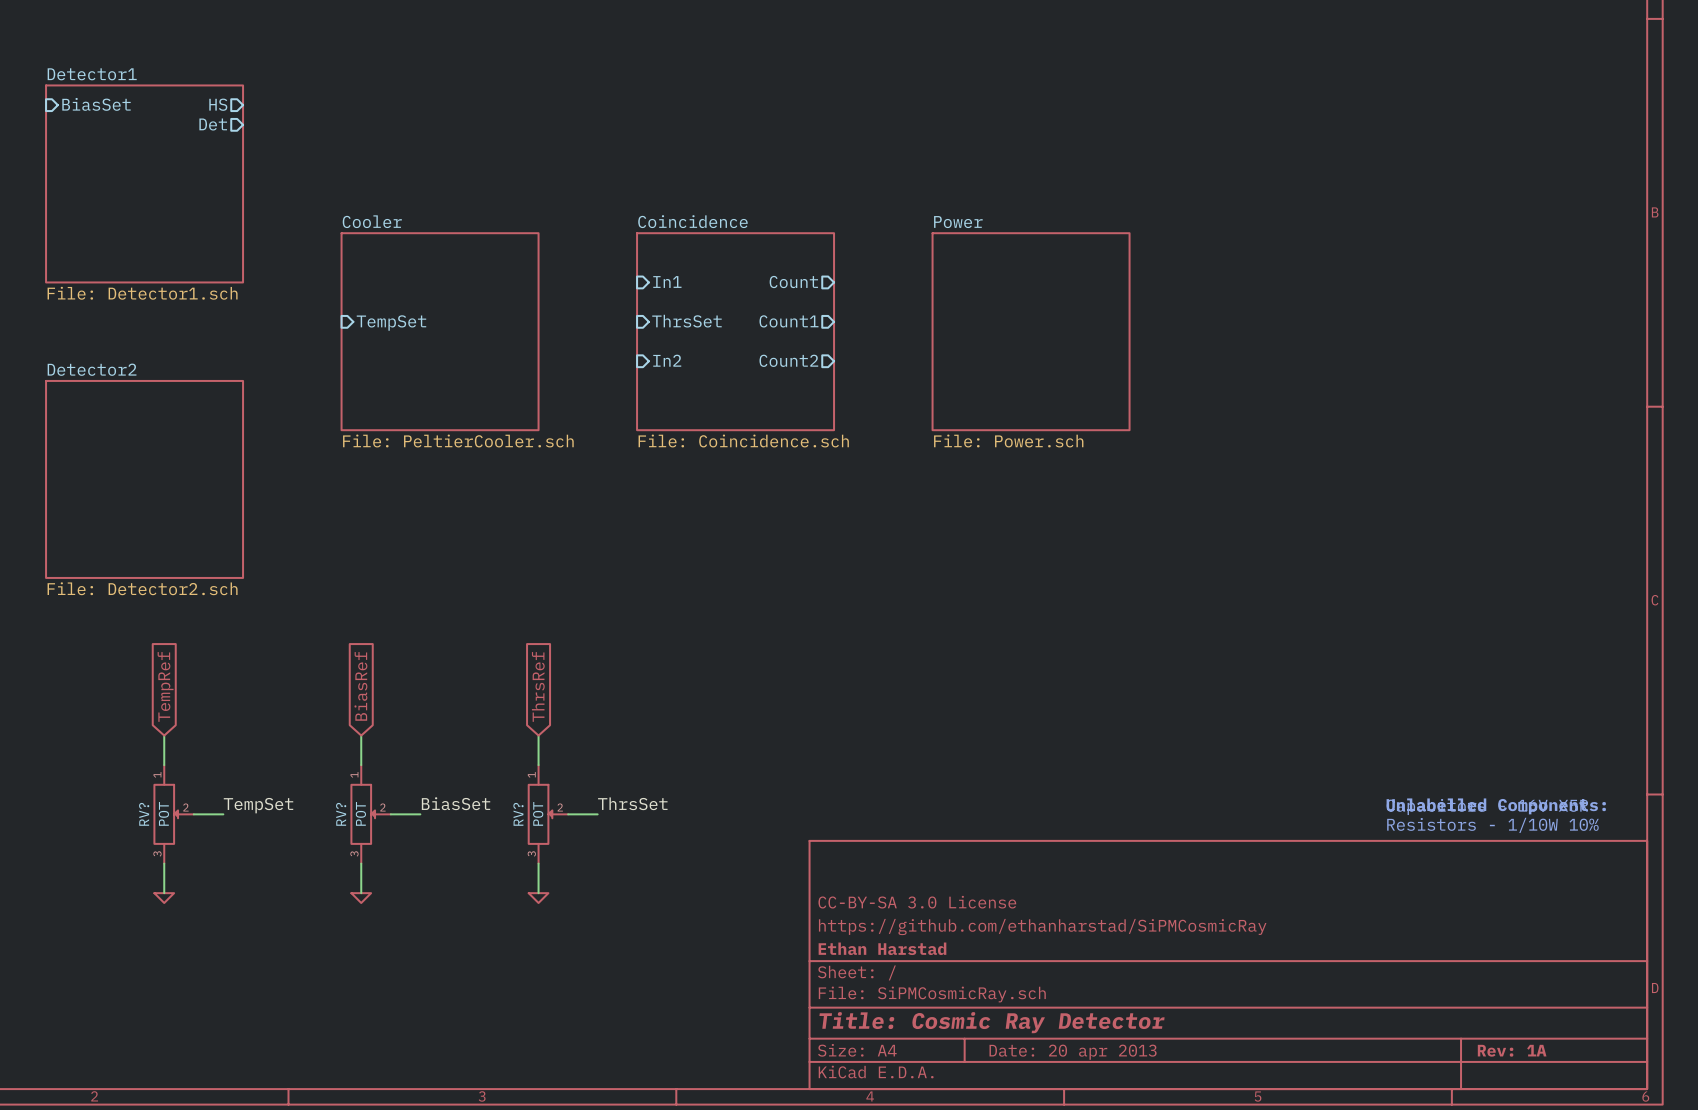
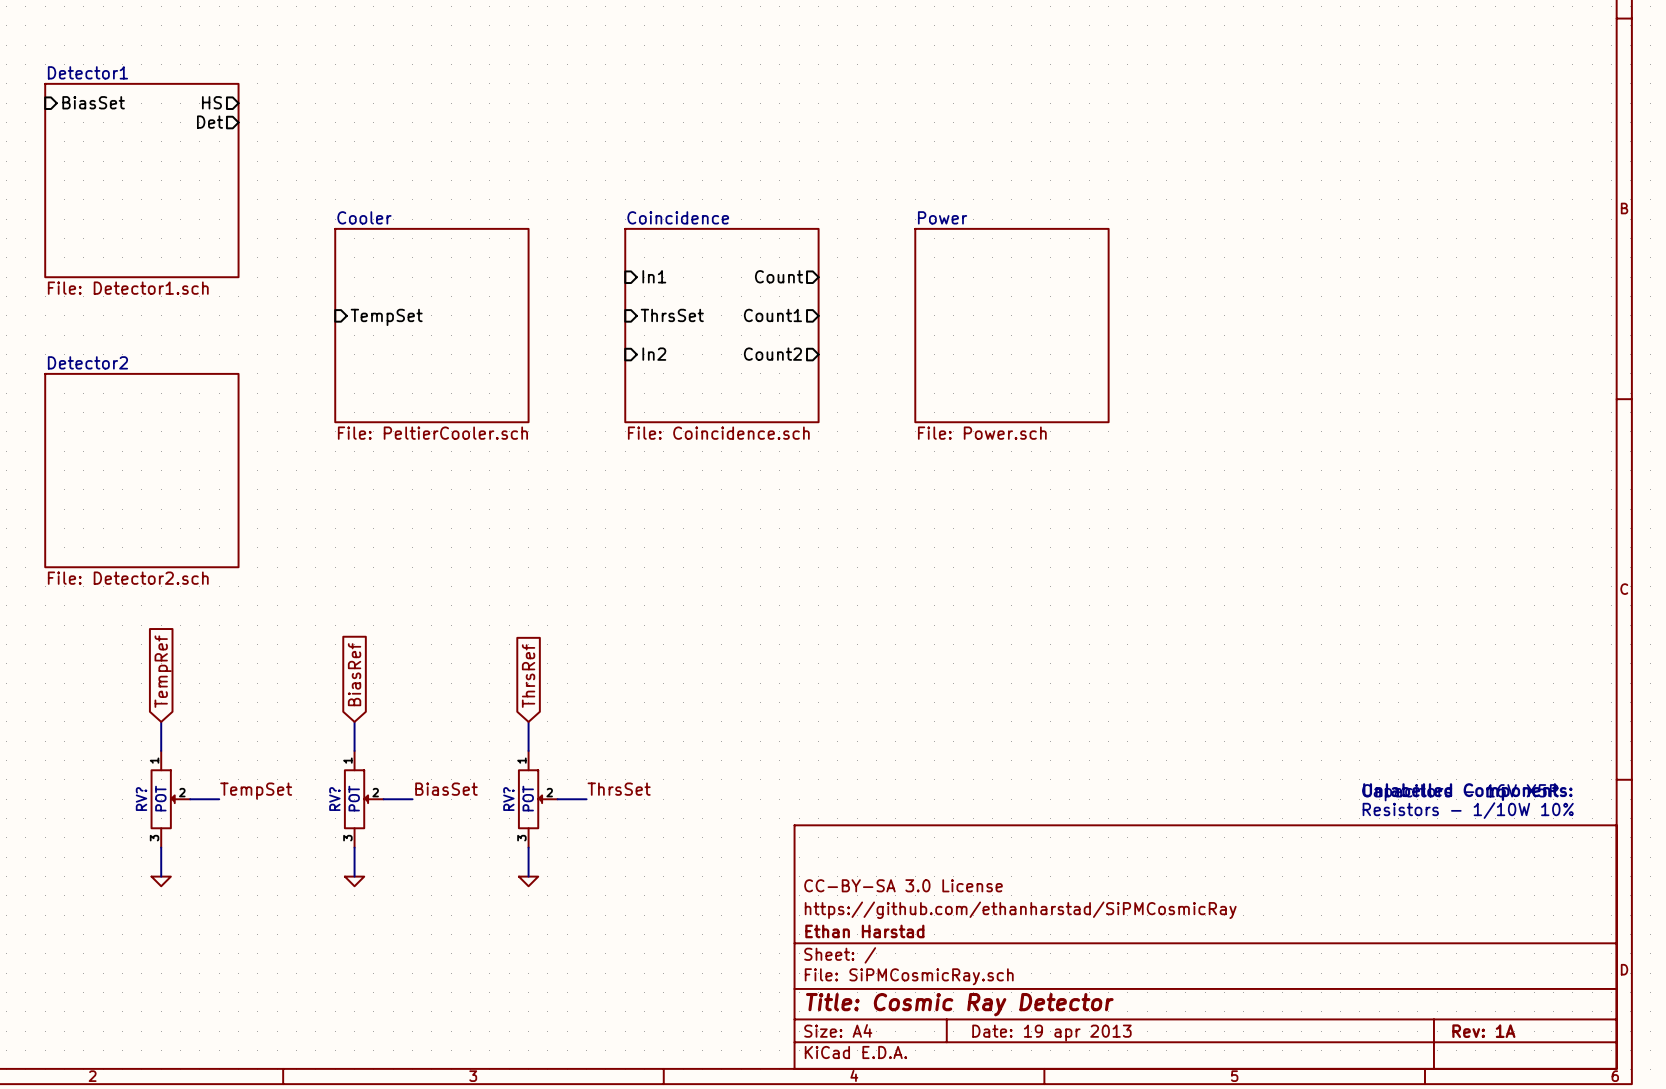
title block: Date: 20 apr 2013 (1073, 1052) -> Date: 19 apr 2013 (1051, 1033)

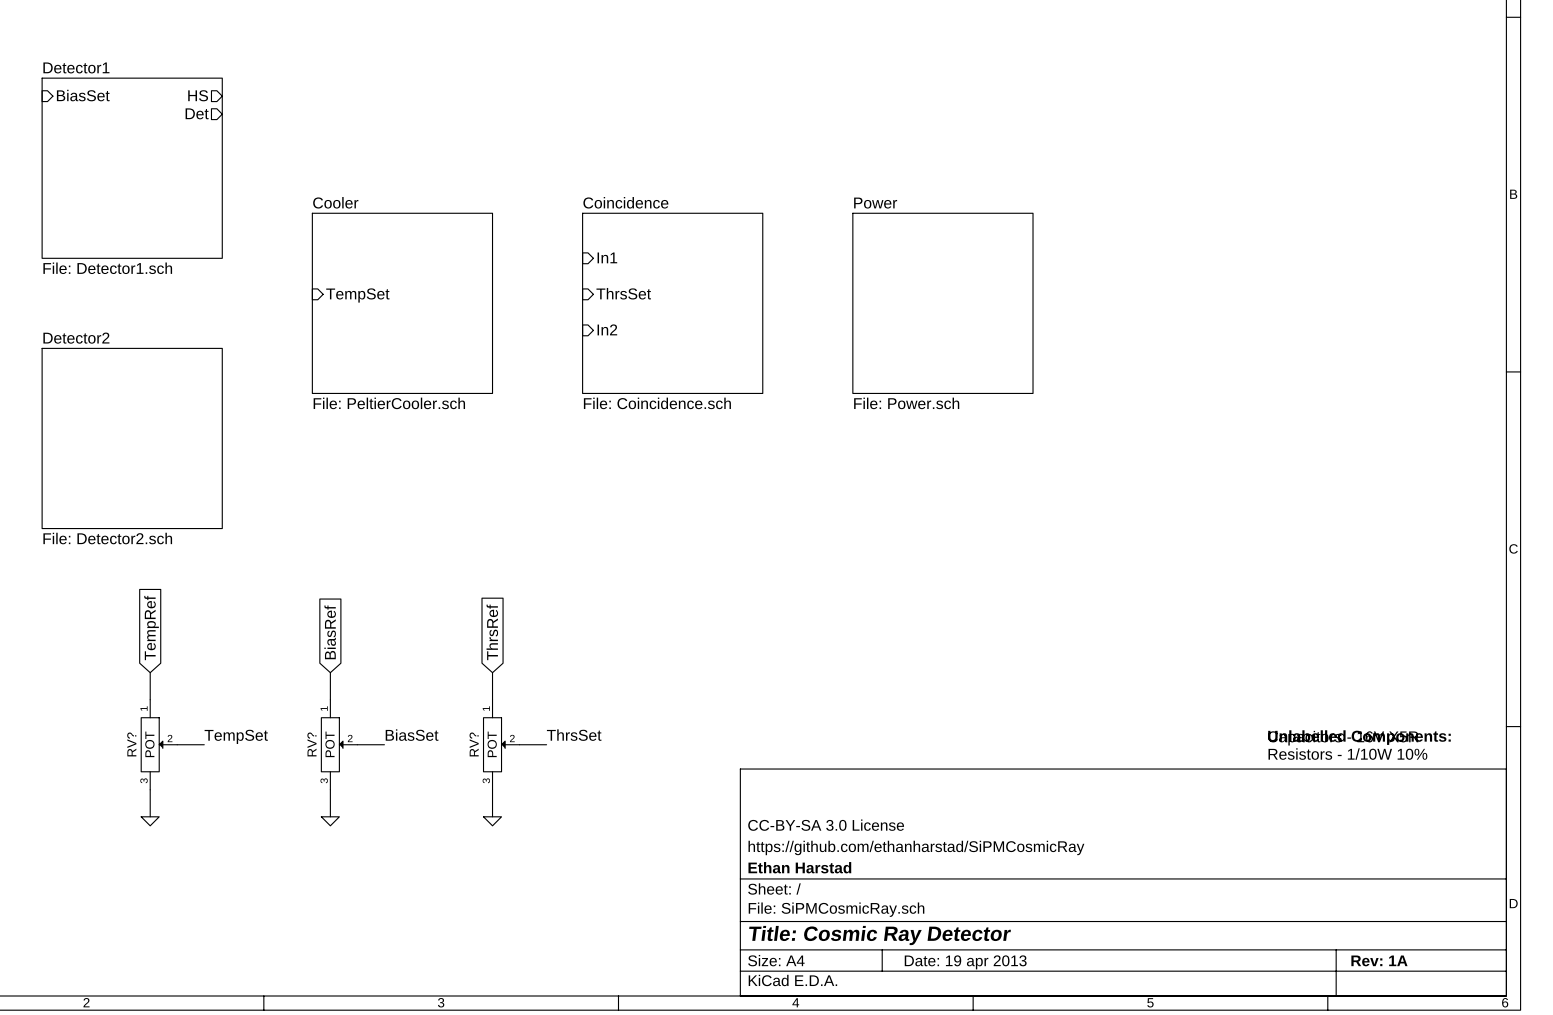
sheet pin: Count (779, 276) -> none
sheet pin: Count1 (772, 315) -> none
sheet pin: Count2 (772, 354) -> none

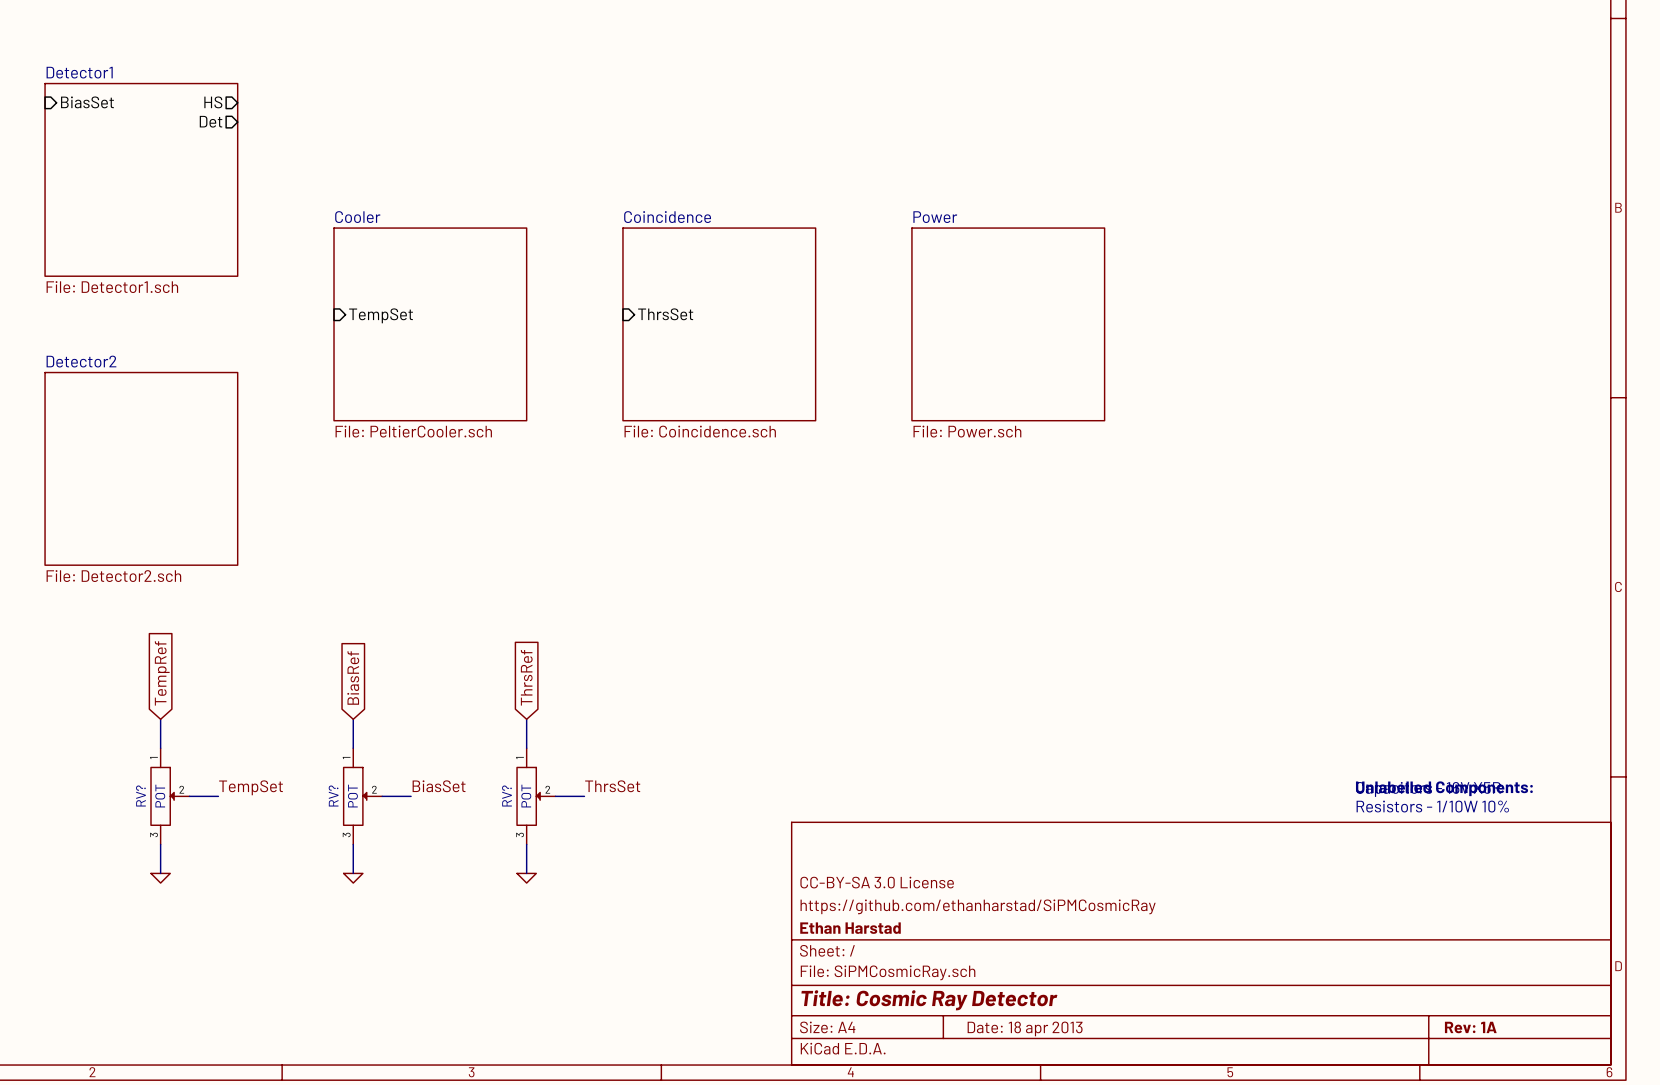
sheet pin: In1 (607, 257) -> none
sheet pin: In2 (607, 329) -> none
title block: Date: 19 apr 2013 (965, 962) -> Date: 18 apr 2013 (1025, 1028)

